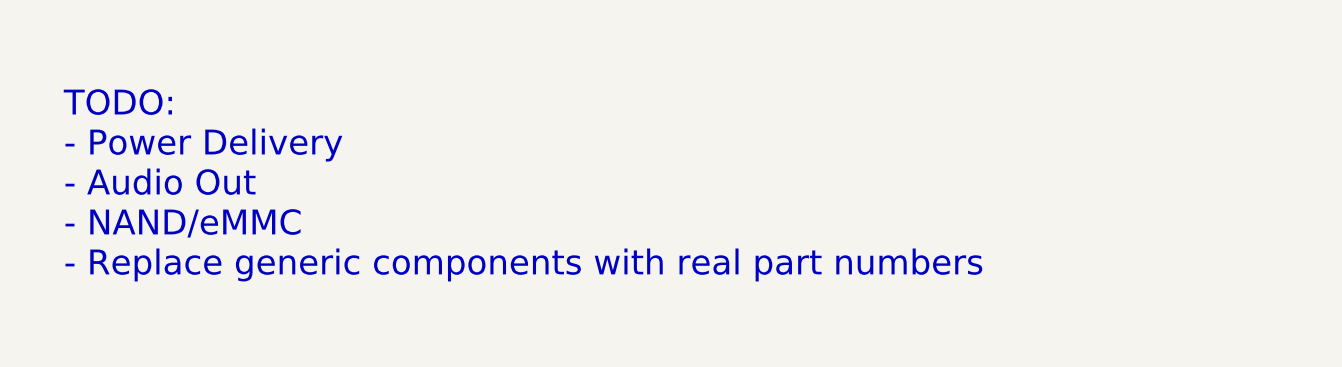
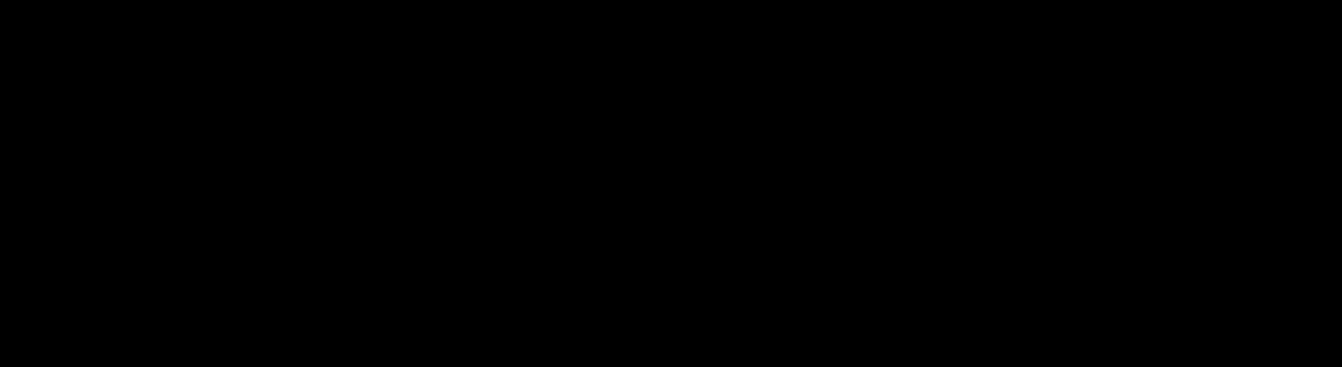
text: TODO: (117, 102) -> none
text: - Power Delivery (203, 145) -> none
text: - Audio Out (160, 181) -> none
text: - NAND/eMMC (183, 223) -> none
text: - Replace generic components with real part numbers (523, 264) -> none

